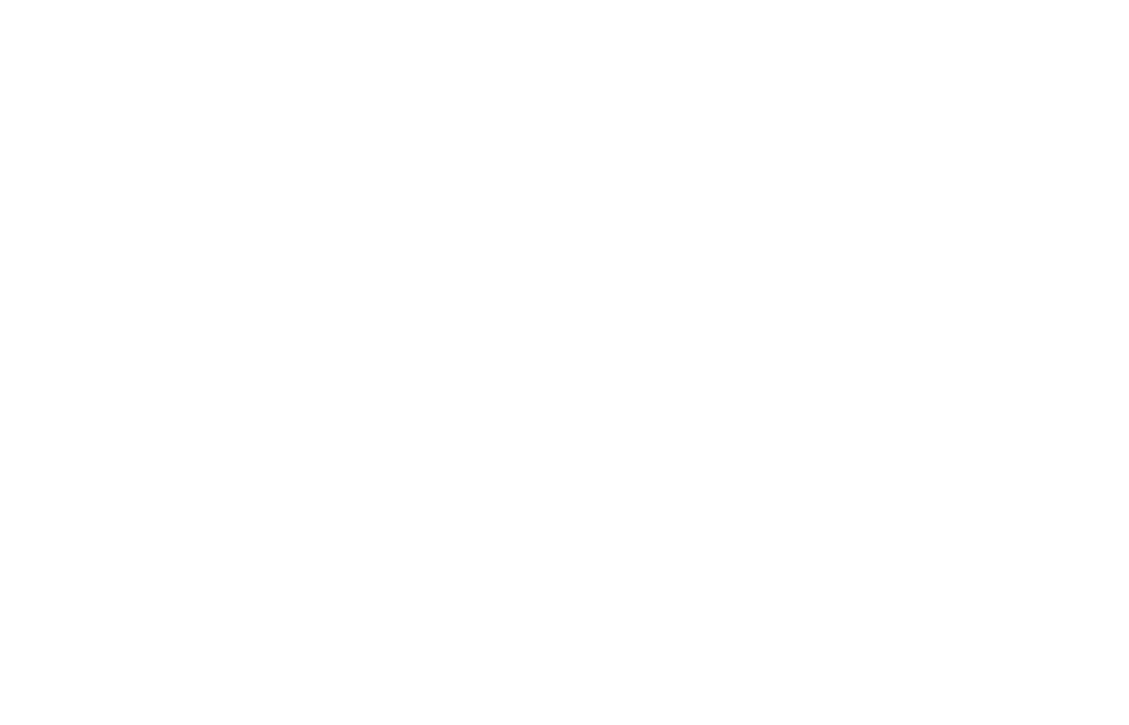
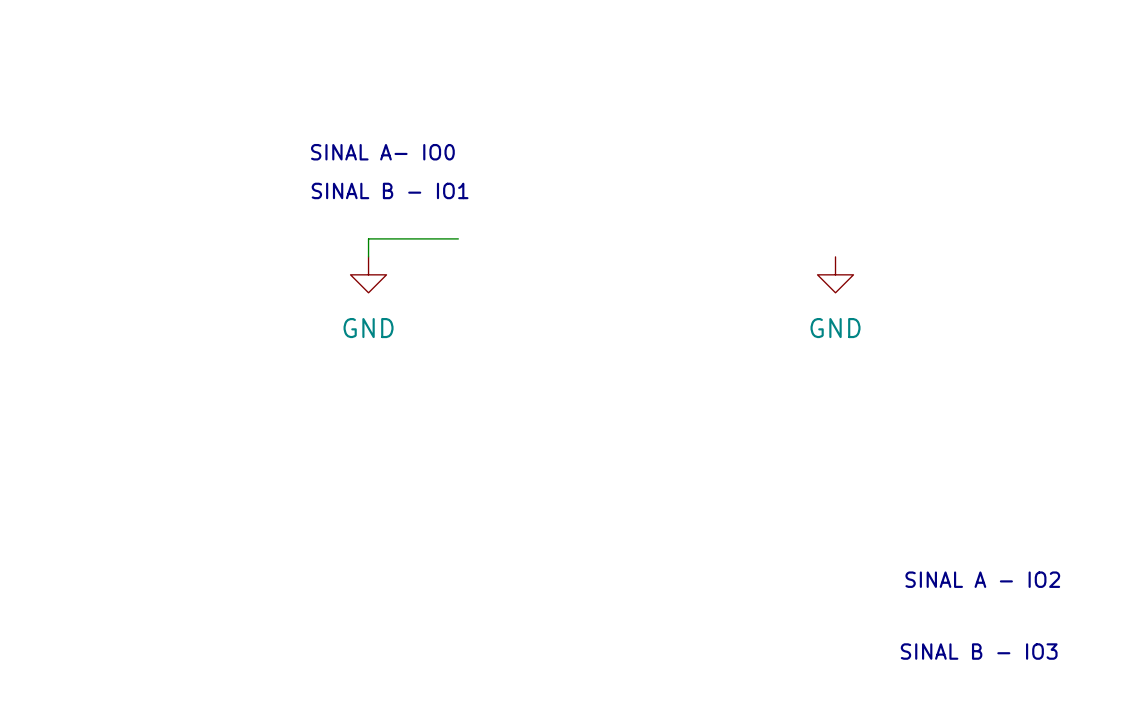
text: none -> SINAL A- IO0 (382, 152)
text: none -> SINAL B - IO1 (390, 190)
wire: none -> (458, 238) (368, 238) (368, 256)
power symbol: none -> GND (368, 274)
power symbol: none -> GND (835, 274)
text: none -> SINAL A - IO2 (982, 579)
text: none -> SINAL B - IO3 (979, 651)

